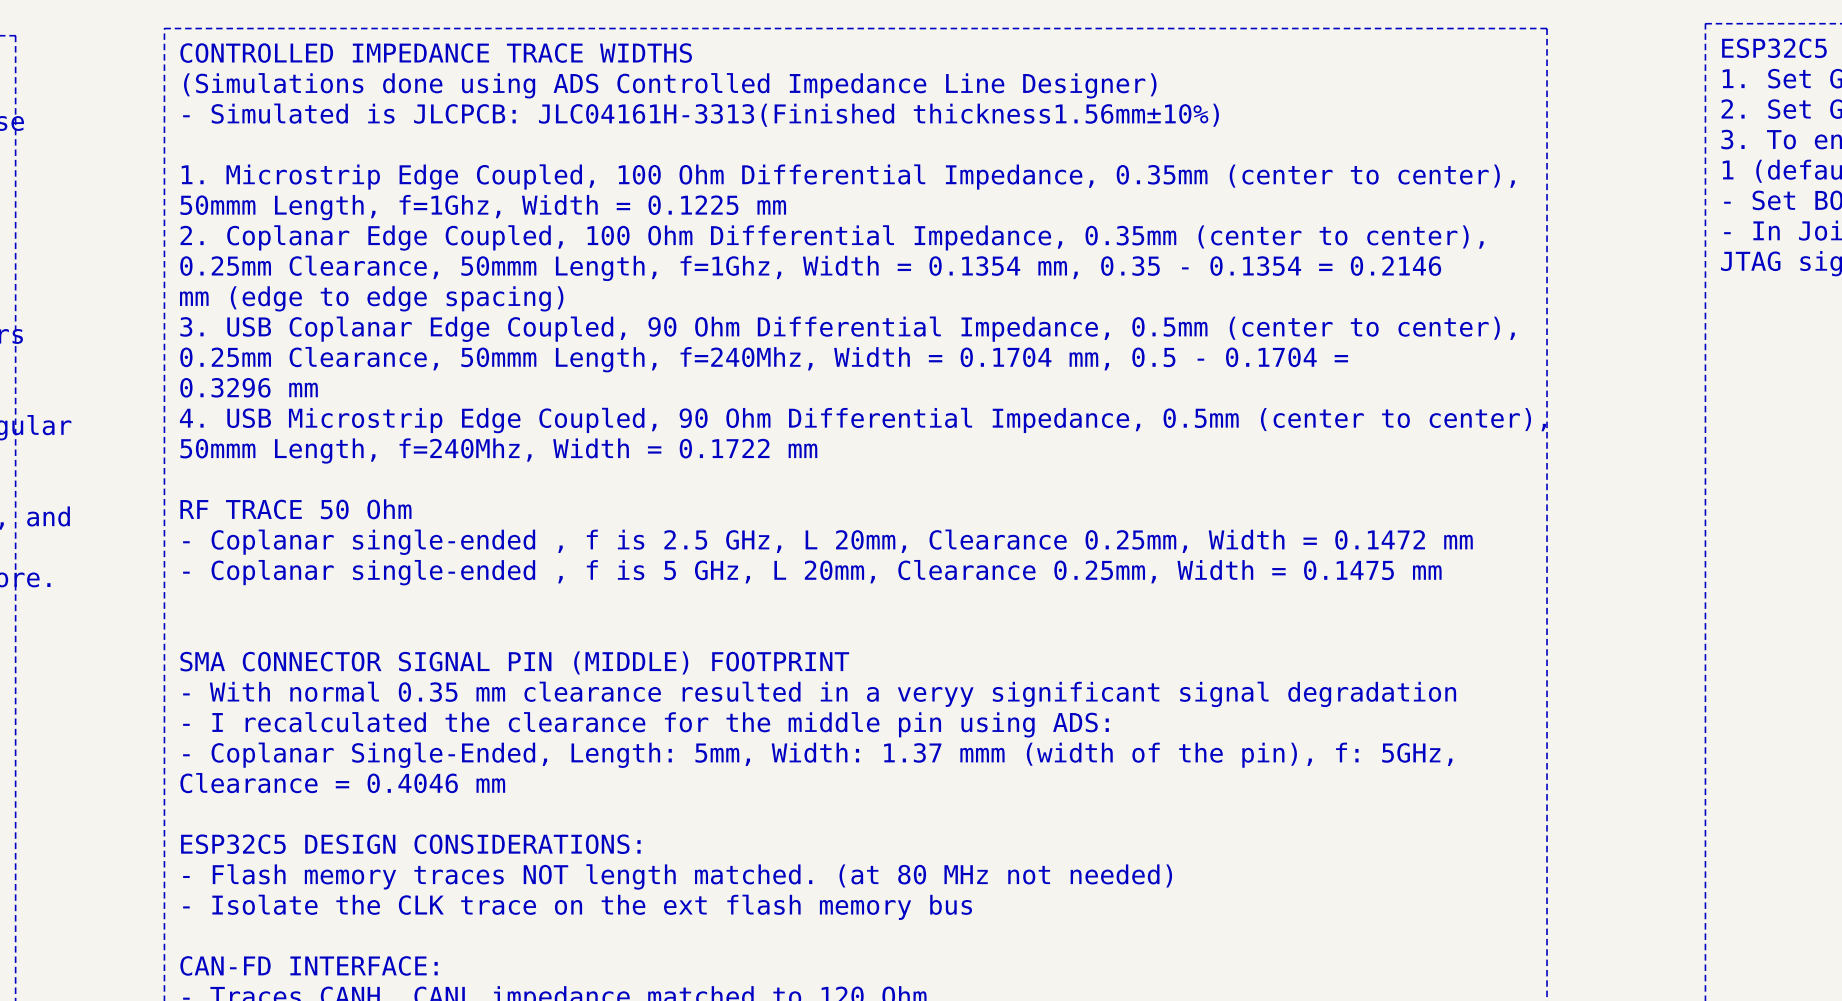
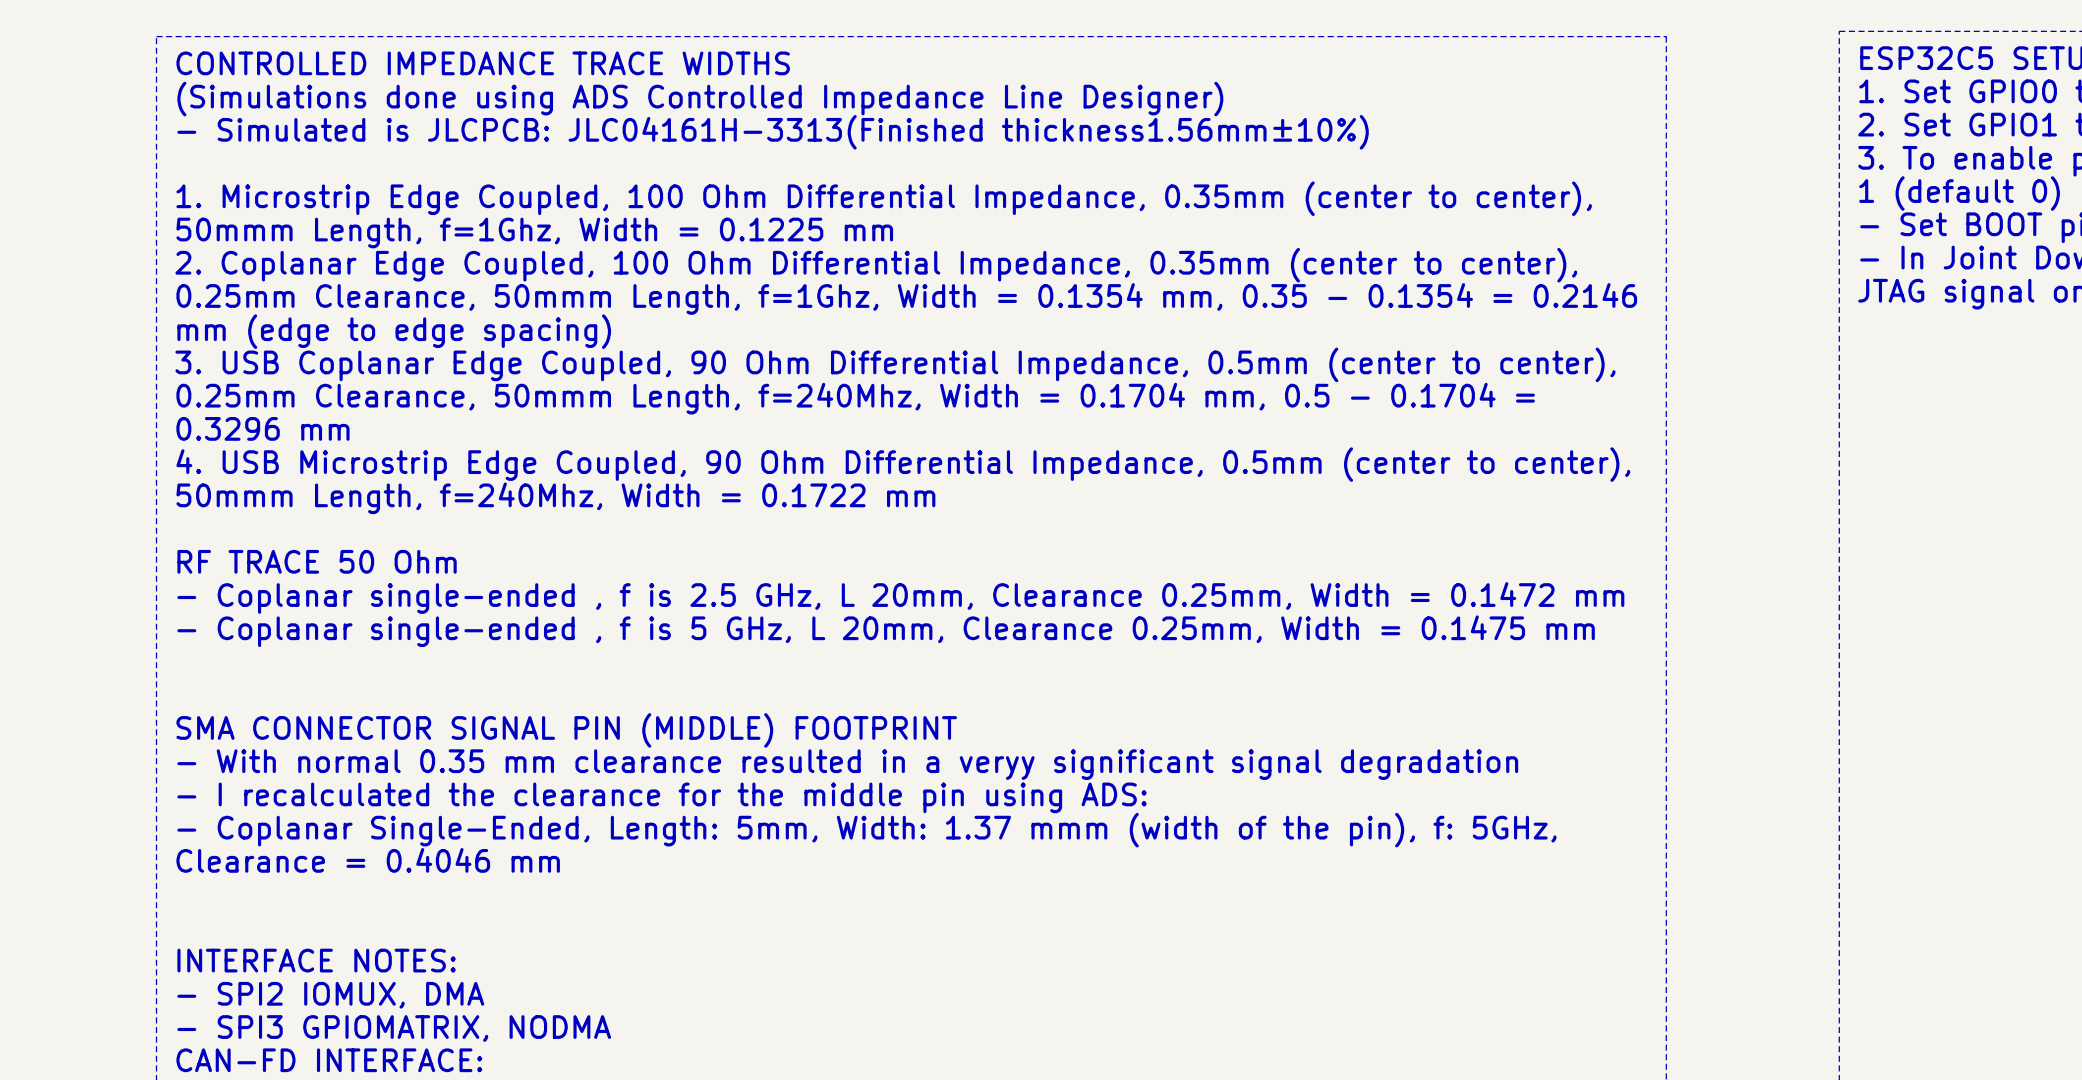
text: ESP32C5 DESIGN CONSIDERATIONS: (410, 844) -> none
text: - Flash memory traces NOT length matched. (at 80 MHz not needed) (677, 876) -> INTERFACE NOTES: (316, 960)
text: - Isolate the CLK trace on the ext flash memory bus (577, 907) -> - SPI2 IOMUX, DMA (330, 995)
text: none -> - SPI3 GPIOMATRIX, NODMA (394, 1028)

